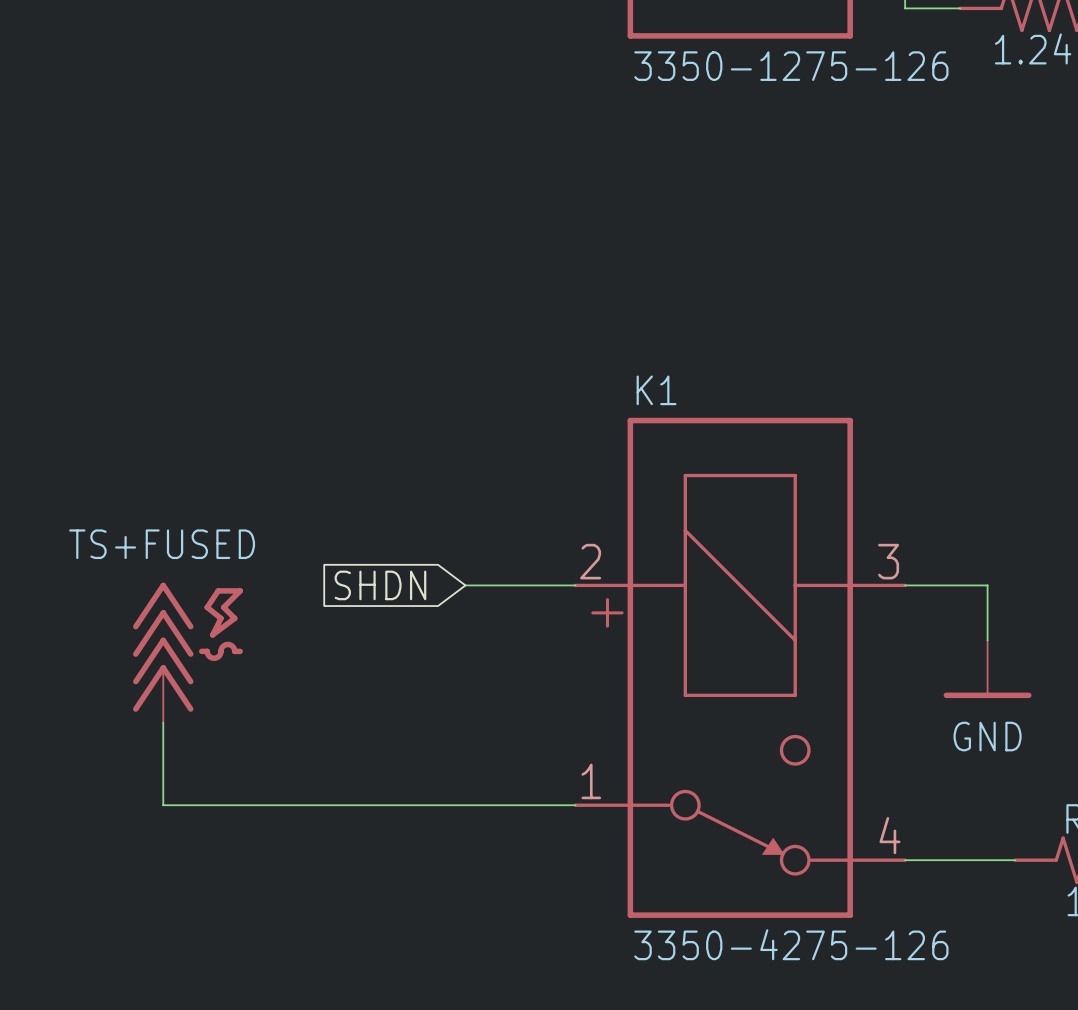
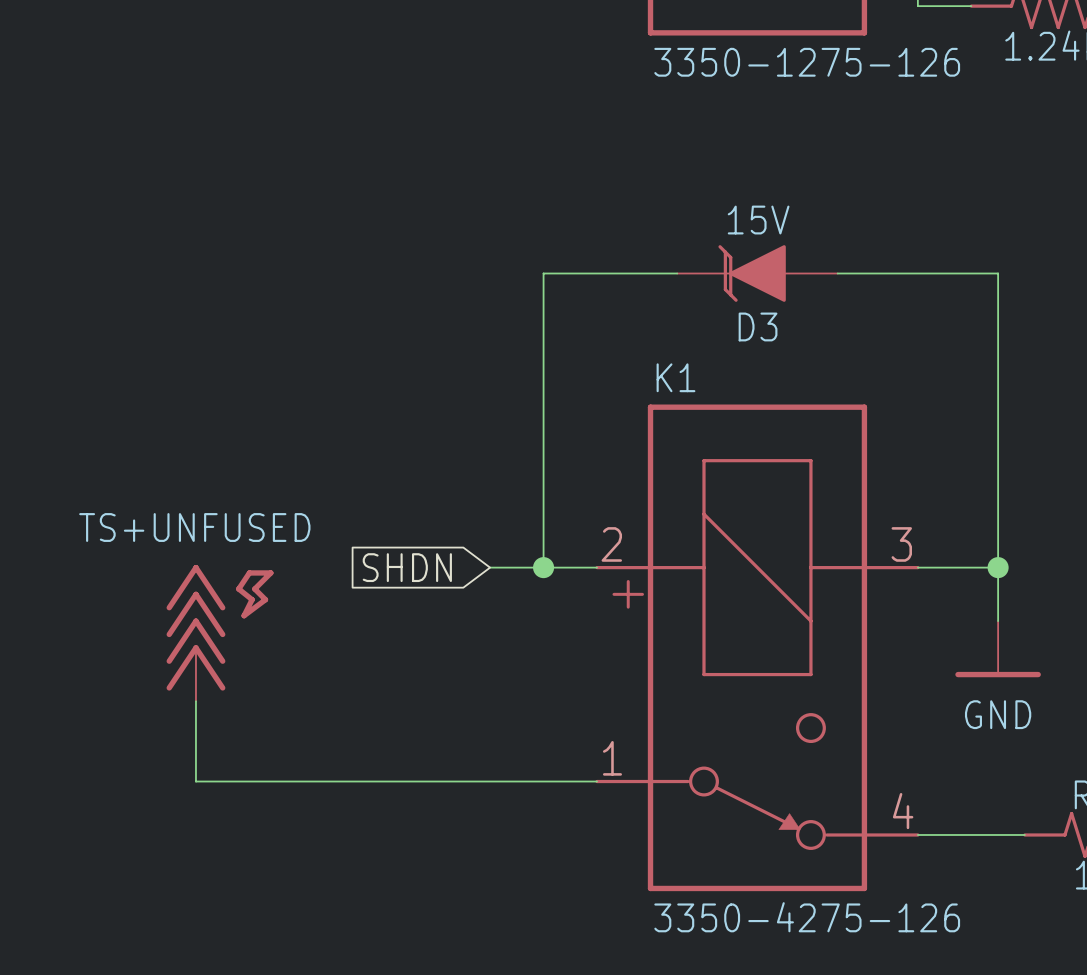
wire: none -> (677, 273) (543, 273) (543, 567)
D3: none -> (757, 273)
wire: none -> (837, 273) (998, 273) (998, 567)
junction: none -> (543, 567)
junction: none -> (998, 567)
power symbol: TS+FUSED (188, 652) -> TS+UNFUSED (220, 633)

